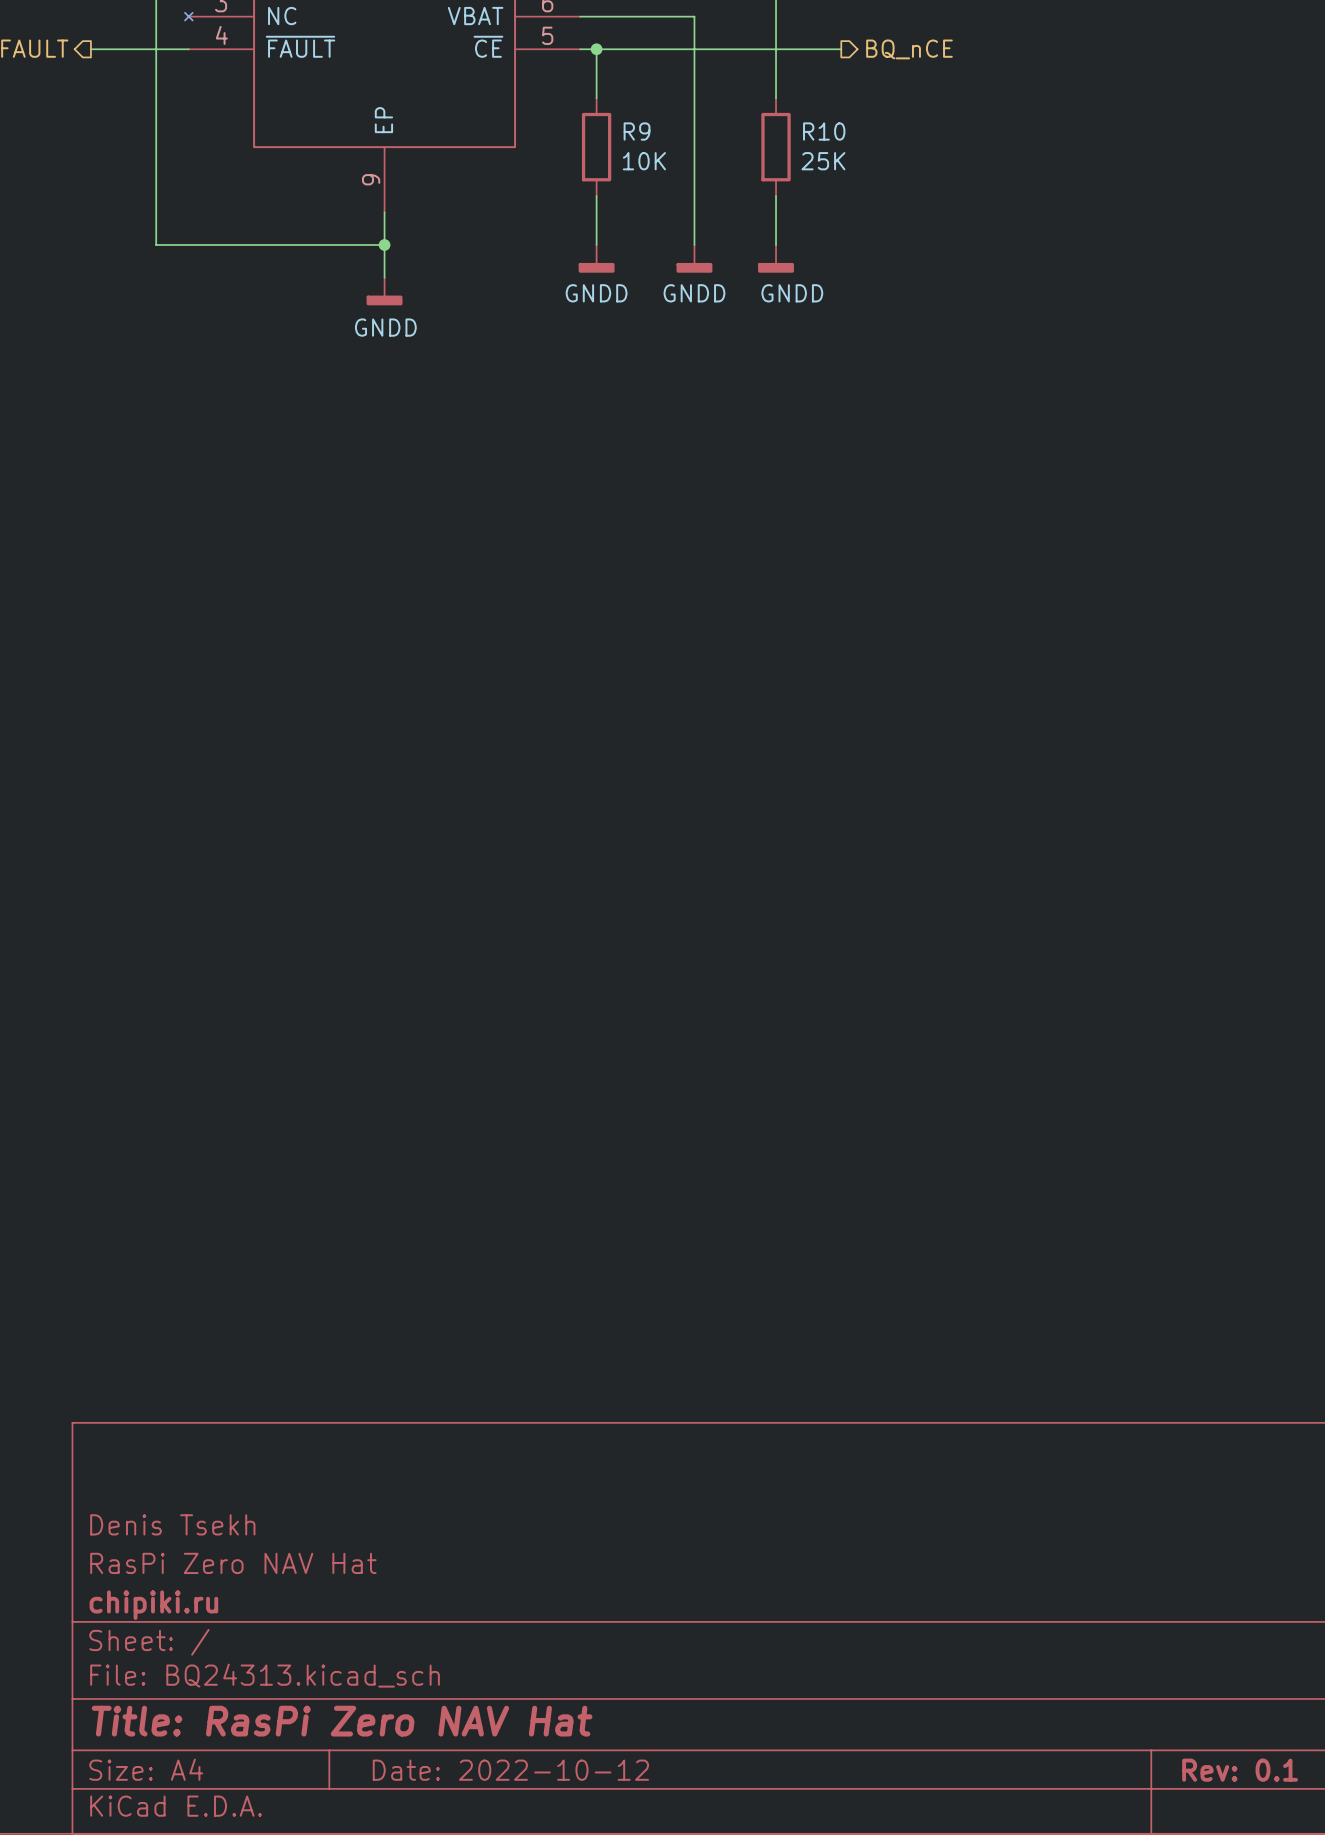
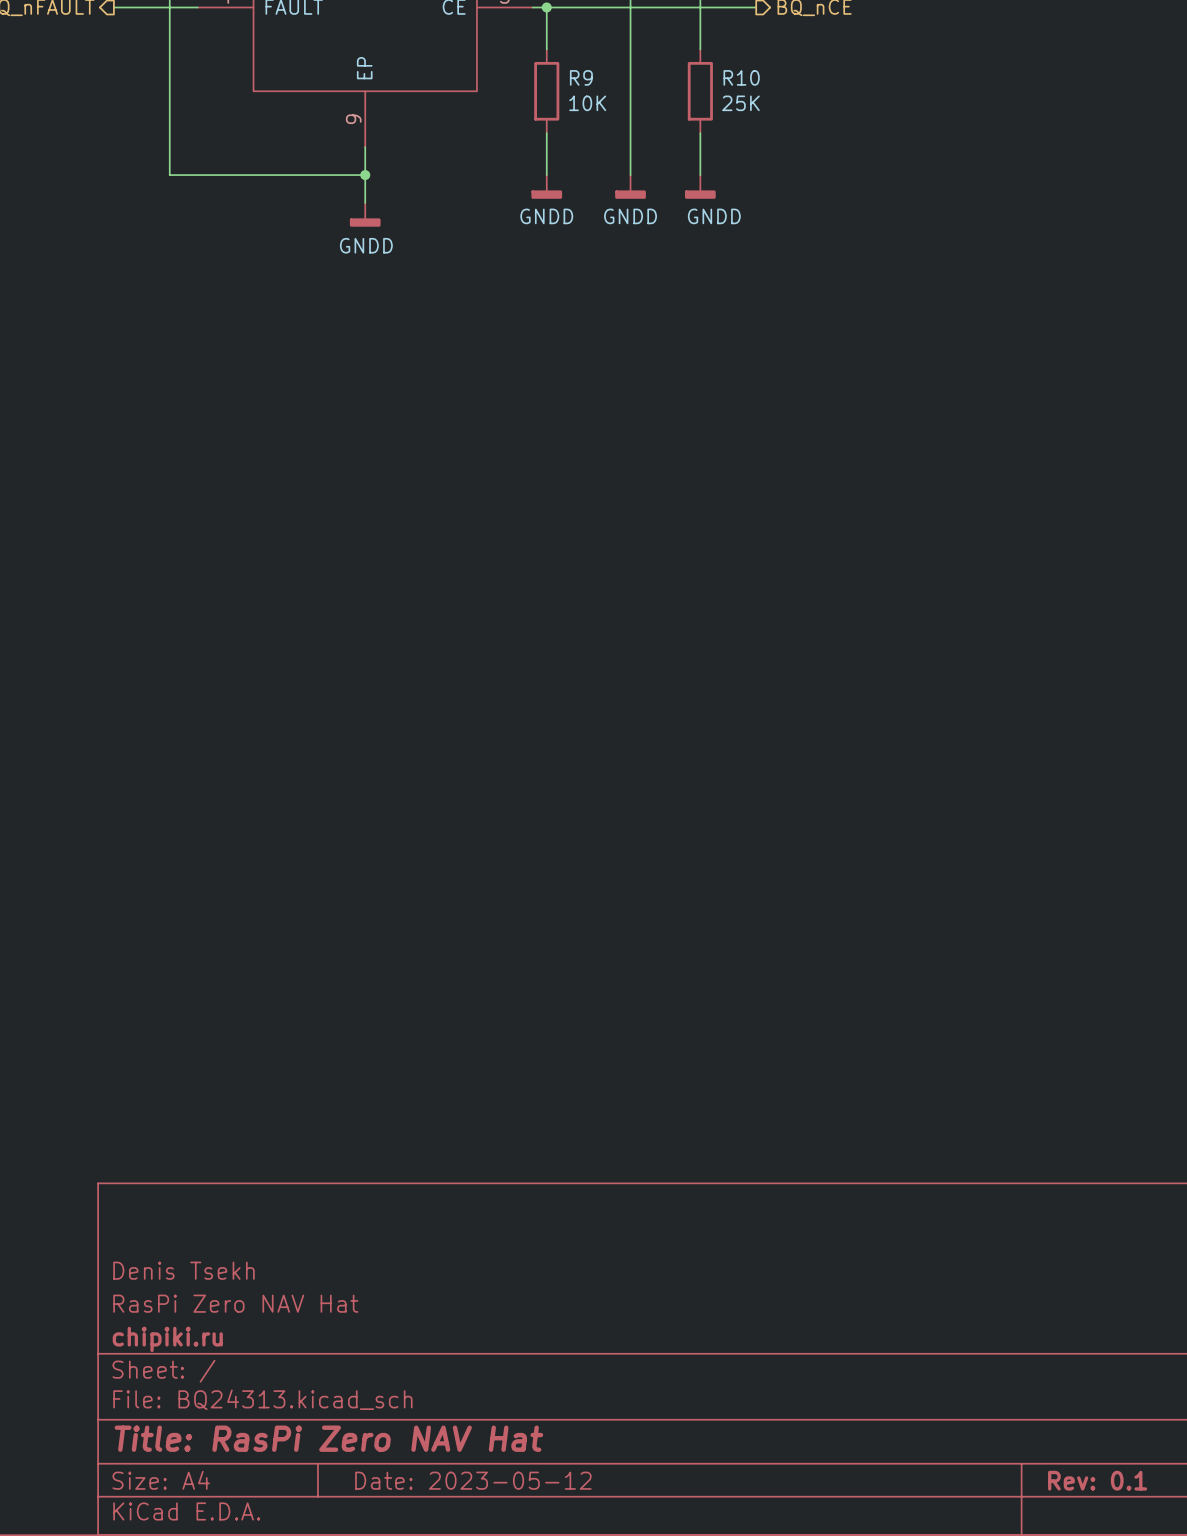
title block: Date: 2022-10-12 (510, 1770) -> Date: 2023-05-12 (473, 1480)

